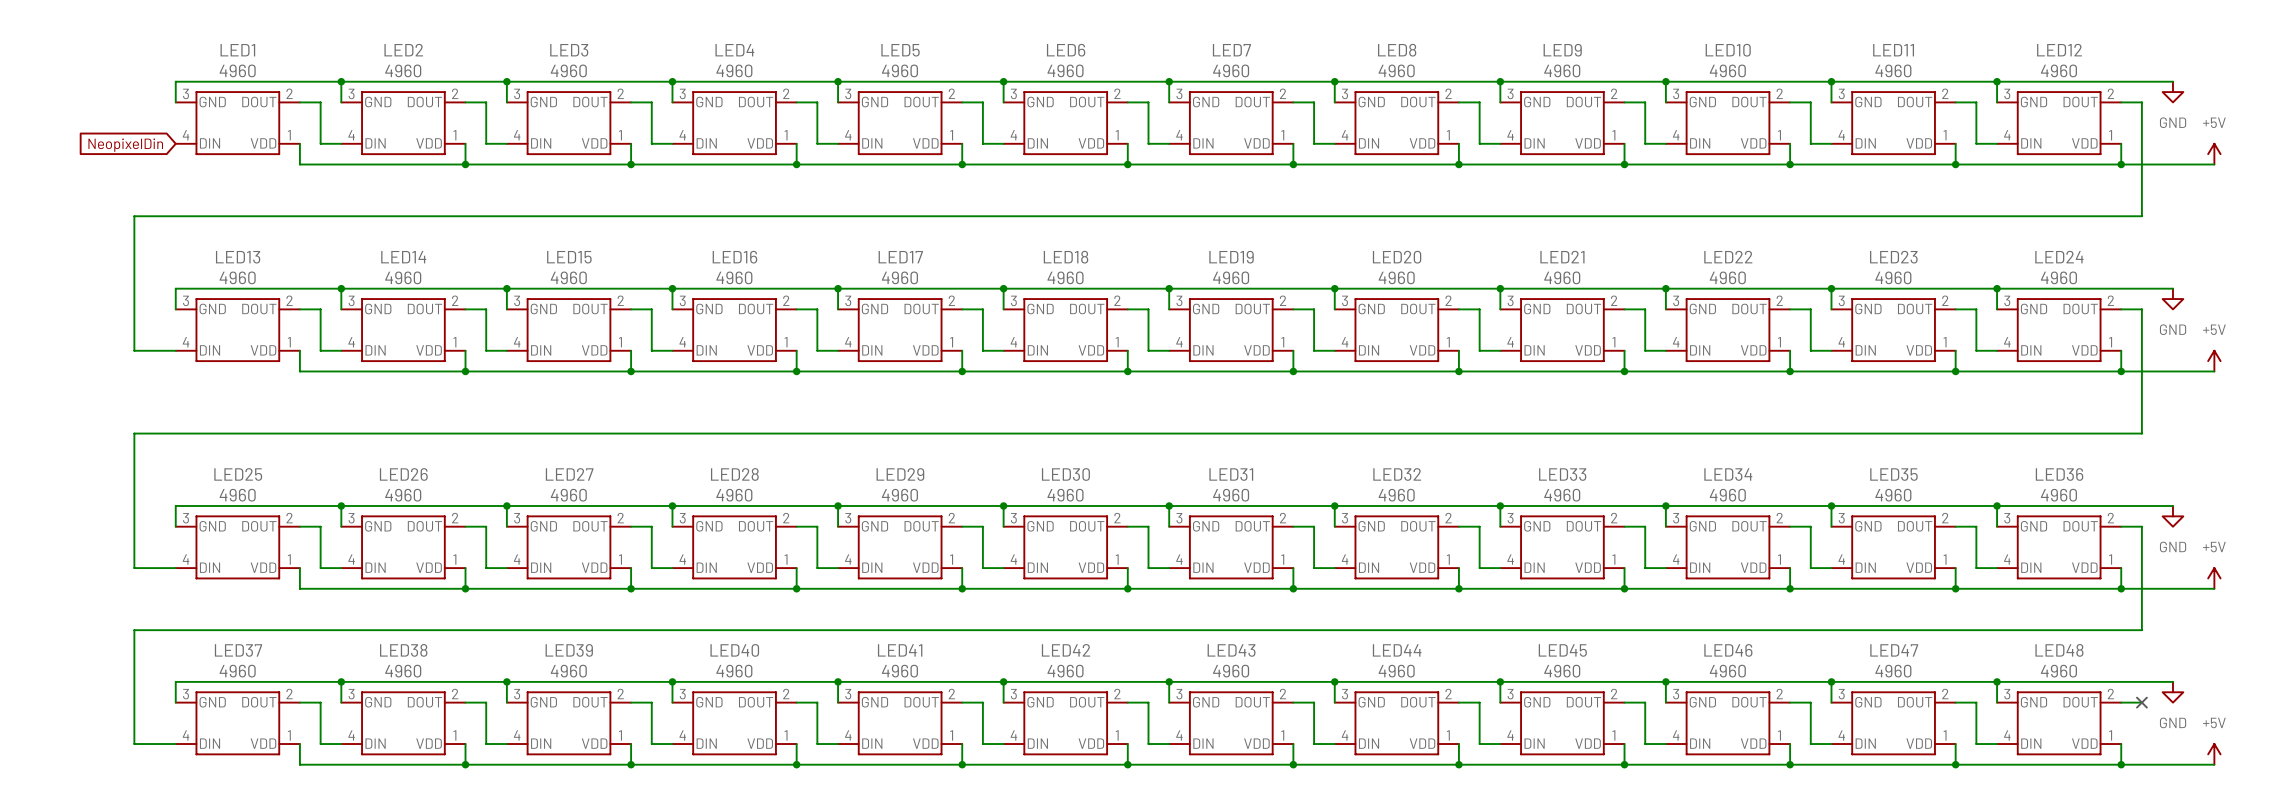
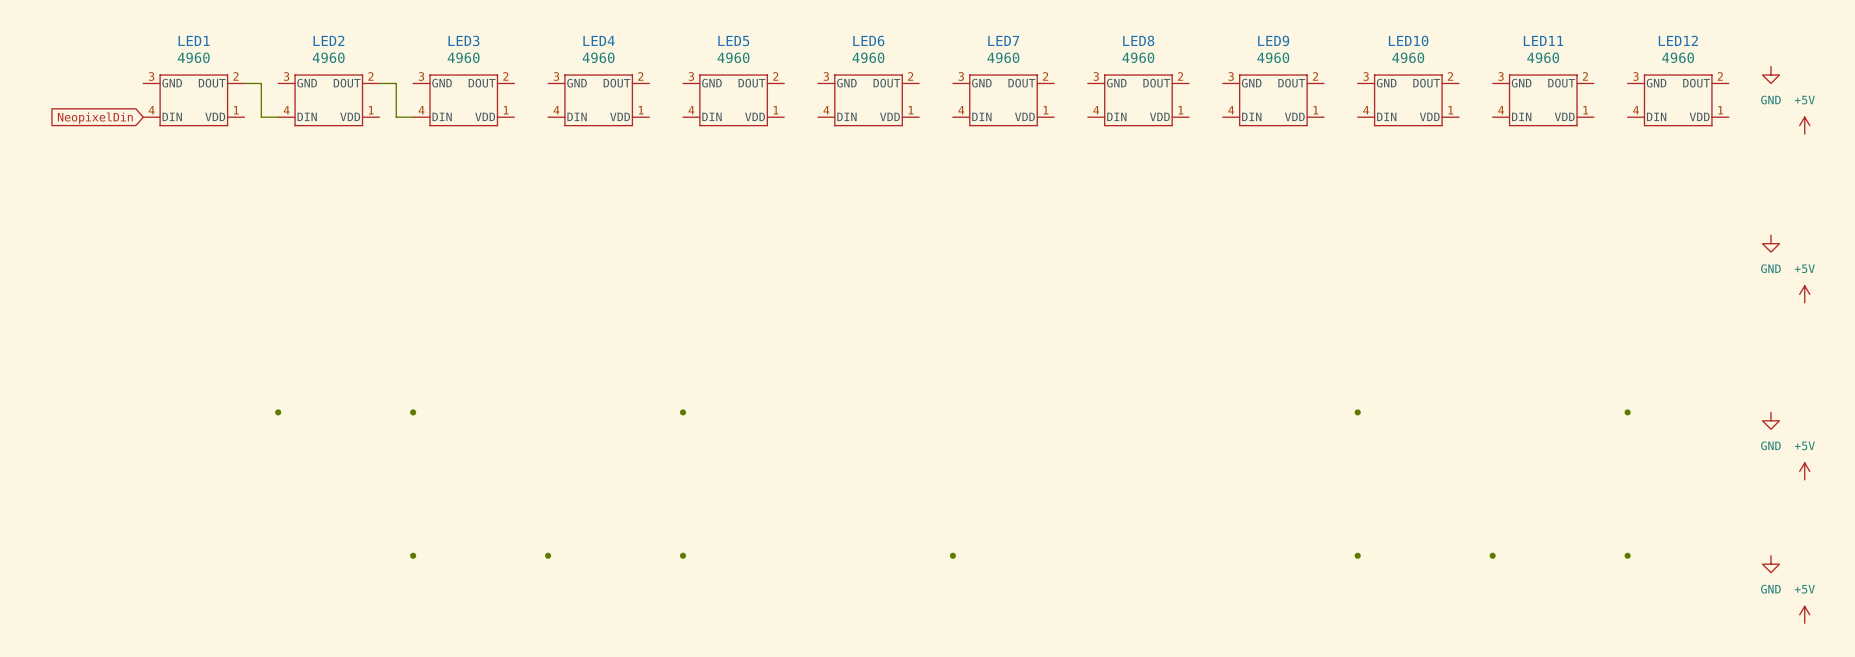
wire: (341, 81) (341, 102) -> none
junction: (341, 81) -> none
wire: (506, 81) (506, 102) -> none
junction: (506, 81) -> none
wire: (672, 81) (672, 102) -> none
junction: (672, 81) -> none
wire: (838, 81) (838, 102) -> none
junction: (838, 81) -> none
wire: (1003, 81) (1003, 102) -> none
junction: (1003, 81) -> none
wire: (1169, 81) (1169, 102) -> none
junction: (1169, 81) -> none
wire: (1334, 81) (1334, 102) -> none
junction: (1334, 81) -> none
wire: (1500, 81) (1500, 102) -> none
junction: (1500, 81) -> none
wire: (1665, 81) (1665, 102) -> none
junction: (1665, 81) -> none
wire: (1831, 81) (1831, 102) -> none
junction: (1831, 81) -> none
wire: (1997, 81) (1997, 102) -> none
junction: (1997, 81) -> none
wire: (2172, 81) (175, 81) (175, 102) -> none
wire: (631, 102) (651, 102) (651, 143) (672, 143) -> none
wire: (796, 102) (817, 102) (817, 143) (838, 143) -> none
wire: (962, 102) (982, 102) (982, 143) (1003, 143) -> none
wire: (1127, 102) (1148, 102) (1148, 143) (1169, 143) -> none
wire: (1293, 102) (1314, 102) (1314, 143) (1334, 143) -> none
wire: (1458, 102) (1479, 102) (1479, 143) (1500, 143) -> none
wire: (1624, 102) (1645, 102) (1645, 143) (1665, 143) -> none
wire: (1790, 102) (1810, 102) (1810, 143) (1831, 143) -> none
wire: (1955, 102) (1976, 102) (1976, 143) (1997, 143) -> none
wire: (2121, 102) (2141, 102) (2141, 216) (134, 216) (134, 350) (175, 350) -> none
wire: (299, 143) (299, 164) (2214, 164) -> none
wire: (465, 143) (465, 164) -> none
wire: (631, 143) (631, 164) -> none
wire: (796, 143) (796, 164) -> none
wire: (962, 143) (962, 164) -> none
wire: (1127, 143) (1127, 164) -> none
wire: (1293, 143) (1293, 164) -> none
wire: (1458, 143) (1458, 164) -> none
wire: (1624, 143) (1624, 164) -> none
wire: (1790, 143) (1790, 164) -> none
wire: (1955, 143) (1955, 164) -> none
wire: (2121, 143) (2121, 164) -> none
junction: (465, 164) -> none
junction: (631, 164) -> none
junction: (796, 164) -> none
junction: (962, 164) -> none
junction: (1127, 164) -> none
junction: (1293, 164) -> none
junction: (1458, 164) -> none
junction: (1624, 164) -> none
junction: (1790, 164) -> none
junction: (1955, 164) -> none
junction: (2121, 164) -> none
wire: (341, 288) (341, 309) -> none
junction: (341, 288) -> none
wire: (506, 288) (506, 309) -> none
junction: (506, 288) -> none
wire: (672, 288) (672, 309) -> none
junction: (672, 288) -> none
wire: (838, 288) (838, 309) -> none
junction: (838, 288) -> none
wire: (1003, 288) (1003, 309) -> none
junction: (1003, 288) -> none
wire: (1169, 288) (1169, 309) -> none
junction: (1169, 288) -> none
wire: (1334, 288) (1334, 309) -> none
junction: (1334, 288) -> none
wire: (1500, 288) (1500, 309) -> none
junction: (1500, 288) -> none
wire: (1665, 288) (1665, 309) -> none
junction: (1665, 288) -> none
wire: (1831, 288) (1831, 309) -> none
junction: (1831, 288) -> none
wire: (1997, 288) (1997, 309) -> none
junction: (1997, 288) -> none
wire: (2172, 288) (175, 288) (175, 309) -> none
wire: (299, 309) (320, 309) (320, 350) (341, 350) -> none
wire: (465, 309) (486, 309) (486, 350) (506, 350) -> none
wire: (631, 309) (651, 309) (651, 350) (672, 350) -> none
wire: (796, 309) (817, 309) (817, 350) (838, 350) -> none
wire: (962, 309) (982, 309) (982, 350) (1003, 350) -> none
wire: (1127, 309) (1148, 309) (1148, 350) (1169, 350) -> none
wire: (1293, 309) (1314, 309) (1314, 350) (1334, 350) -> none
wire: (1458, 309) (1479, 309) (1479, 350) (1500, 350) -> none
wire: (1624, 309) (1645, 309) (1645, 350) (1665, 350) -> none
wire: (1790, 309) (1810, 309) (1810, 350) (1831, 350) -> none
wire: (1955, 309) (1976, 309) (1976, 350) (1997, 350) -> none
wire: (2121, 309) (2141, 309) (2141, 433) (134, 433) (134, 568) (175, 568) -> none
LED13: 4960 (237, 330) -> none
LED14: 4960 (403, 330) -> none
LED15: 4960 (568, 330) -> none
LED16: 4960 (734, 330) -> none
LED17: 4960 (900, 330) -> none
LED18: 4960 (1065, 330) -> none
LED19: 4960 (1231, 330) -> none
LED20: 4960 (1396, 330) -> none
LED21: 4960 (1562, 330) -> none
LED22: 4960 (1728, 330) -> none
LED23: 4960 (1893, 330) -> none
LED24: 4960 (2059, 330) -> none
wire: (299, 350) (299, 371) (2214, 371) -> none
wire: (465, 350) (465, 371) -> none
wire: (631, 350) (631, 371) -> none
wire: (796, 350) (796, 371) -> none
wire: (962, 350) (962, 371) -> none
wire: (1127, 350) (1127, 371) -> none
wire: (1293, 350) (1293, 371) -> none
wire: (1458, 350) (1458, 371) -> none
wire: (1624, 350) (1624, 371) -> none
wire: (1790, 350) (1790, 371) -> none
wire: (1955, 350) (1955, 371) -> none
wire: (2121, 350) (2121, 371) -> none
junction: (465, 371) -> none
junction: (631, 371) -> none
junction: (796, 371) -> none
junction: (962, 371) -> none
junction: (1127, 371) -> none
junction: (1293, 371) -> none
junction: (1458, 371) -> none
junction: (1624, 371) -> none
junction: (1790, 371) -> none
junction: (1955, 371) -> none
junction: (2121, 371) -> none
wire: (341, 506) (341, 526) -> none
wire: (506, 506) (506, 526) -> none
wire: (672, 506) (672, 526) -> none
junction: (672, 506) -> none
wire: (838, 506) (838, 526) -> none
wire: (1003, 506) (1003, 526) -> none
junction: (1003, 506) -> none
wire: (1169, 506) (1169, 526) -> none
junction: (1169, 506) -> none
wire: (1334, 506) (1334, 526) -> none
junction: (1334, 506) -> none
wire: (1500, 506) (1500, 526) -> none
junction: (1500, 506) -> none
wire: (1665, 506) (1665, 526) -> none
wire: (1831, 506) (1831, 526) -> none
junction: (1831, 506) -> none
wire: (1997, 506) (1997, 526) -> none
wire: (2172, 506) (175, 506) (175, 526) -> none
wire: (299, 526) (320, 526) (320, 568) (341, 568) -> none
wire: (465, 526) (486, 526) (486, 568) (506, 568) -> none
wire: (631, 526) (651, 526) (651, 568) (672, 568) -> none
wire: (796, 526) (817, 526) (817, 568) (838, 568) -> none
wire: (962, 526) (982, 526) (982, 568) (1003, 568) -> none
wire: (1127, 526) (1148, 526) (1148, 568) (1169, 568) -> none
wire: (1293, 526) (1314, 526) (1314, 568) (1334, 568) -> none
wire: (1458, 526) (1479, 526) (1479, 568) (1500, 568) -> none
wire: (1624, 526) (1645, 526) (1645, 568) (1665, 568) -> none
wire: (1790, 526) (1810, 526) (1810, 568) (1831, 568) -> none
wire: (1955, 526) (1976, 526) (1976, 568) (1997, 568) -> none
wire: (2121, 526) (2141, 526) (2141, 630) (134, 630) (134, 744) (175, 744) -> none
LED25: 4960 (237, 547) -> none
LED26: 4960 (403, 547) -> none
LED27: 4960 (568, 547) -> none
LED28: 4960 (734, 547) -> none
LED29: 4960 (900, 547) -> none
LED30: 4960 (1065, 547) -> none
LED31: 4960 (1231, 547) -> none
LED32: 4960 (1396, 547) -> none
LED33: 4960 (1562, 547) -> none
LED34: 4960 (1728, 547) -> none
LED35: 4960 (1893, 547) -> none
LED36: 4960 (2059, 547) -> none
wire: (299, 568) (299, 588) (2214, 588) -> none
wire: (465, 568) (465, 588) -> none
wire: (631, 568) (631, 588) -> none
wire: (796, 568) (796, 588) -> none
wire: (962, 568) (962, 588) -> none
wire: (1127, 568) (1127, 588) -> none
wire: (1293, 568) (1293, 588) -> none
wire: (1458, 568) (1458, 588) -> none
wire: (1624, 568) (1624, 588) -> none
wire: (1790, 568) (1790, 588) -> none
wire: (1955, 568) (1955, 588) -> none
wire: (2121, 568) (2121, 588) -> none
junction: (465, 588) -> none
junction: (631, 588) -> none
junction: (796, 588) -> none
junction: (962, 588) -> none
junction: (1127, 588) -> none
junction: (1293, 588) -> none
junction: (1458, 588) -> none
junction: (1624, 588) -> none
junction: (1790, 588) -> none
junction: (1955, 588) -> none
junction: (2121, 588) -> none
wire: (341, 681) (341, 702) -> none
junction: (341, 681) -> none
wire: (506, 681) (506, 702) -> none
wire: (672, 681) (672, 702) -> none
wire: (838, 681) (838, 702) -> none
wire: (1003, 681) (1003, 702) -> none
junction: (1003, 681) -> none
wire: (1169, 681) (1169, 702) -> none
wire: (1334, 681) (1334, 702) -> none
junction: (1334, 681) -> none
wire: (1500, 681) (1500, 702) -> none
junction: (1500, 681) -> none
wire: (1665, 681) (1665, 702) -> none
wire: (1831, 681) (1831, 702) -> none
wire: (1997, 681) (1997, 702) -> none
wire: (2172, 681) (175, 681) (175, 702) -> none
wire: (299, 702) (320, 702) (320, 744) (341, 744) -> none
wire: (465, 702) (486, 702) (486, 744) (506, 744) -> none
wire: (631, 702) (651, 702) (651, 744) (672, 744) -> none
wire: (796, 702) (817, 702) (817, 744) (838, 744) -> none
wire: (962, 702) (982, 702) (982, 744) (1003, 744) -> none
wire: (1127, 702) (1148, 702) (1148, 744) (1169, 744) -> none
wire: (1293, 702) (1314, 702) (1314, 744) (1334, 744) -> none
wire: (1458, 702) (1479, 702) (1479, 744) (1500, 744) -> none
wire: (1624, 702) (1645, 702) (1645, 744) (1665, 744) -> none
wire: (1790, 702) (1810, 702) (1810, 744) (1831, 744) -> none
wire: (1955, 702) (1976, 702) (1976, 744) (1997, 744) -> none
wire: (2121, 702) (2141, 702) -> none
no-connect mark: (2141, 702) -> none
LED37: 4960 (237, 723) -> none
LED38: 4960 (403, 723) -> none
LED39: 4960 (568, 723) -> none
LED40: 4960 (734, 723) -> none
LED41: 4960 (900, 723) -> none
LED42: 4960 (1065, 723) -> none
LED43: 4960 (1231, 723) -> none
LED44: 4960 (1396, 723) -> none
LED45: 4960 (1562, 723) -> none
LED46: 4960 (1728, 723) -> none
LED47: 4960 (1893, 723) -> none
LED48: 4960 (2059, 723) -> none
wire: (299, 744) (299, 764) (2214, 764) -> none
wire: (465, 744) (465, 764) -> none
wire: (631, 744) (631, 764) -> none
wire: (796, 744) (796, 764) -> none
wire: (962, 744) (962, 764) -> none
wire: (1127, 744) (1127, 764) -> none
wire: (1293, 744) (1293, 764) -> none
wire: (1458, 744) (1458, 764) -> none
wire: (1624, 744) (1624, 764) -> none
wire: (1790, 744) (1790, 764) -> none
wire: (1955, 744) (1955, 764) -> none
wire: (2121, 744) (2121, 764) -> none
junction: (465, 764) -> none
junction: (631, 764) -> none
junction: (796, 764) -> none
junction: (962, 764) -> none
junction: (1127, 764) -> none
junction: (1293, 764) -> none
junction: (1458, 764) -> none
junction: (1624, 764) -> none
junction: (1790, 764) -> none
junction: (1955, 764) -> none
junction: (2121, 764) -> none

